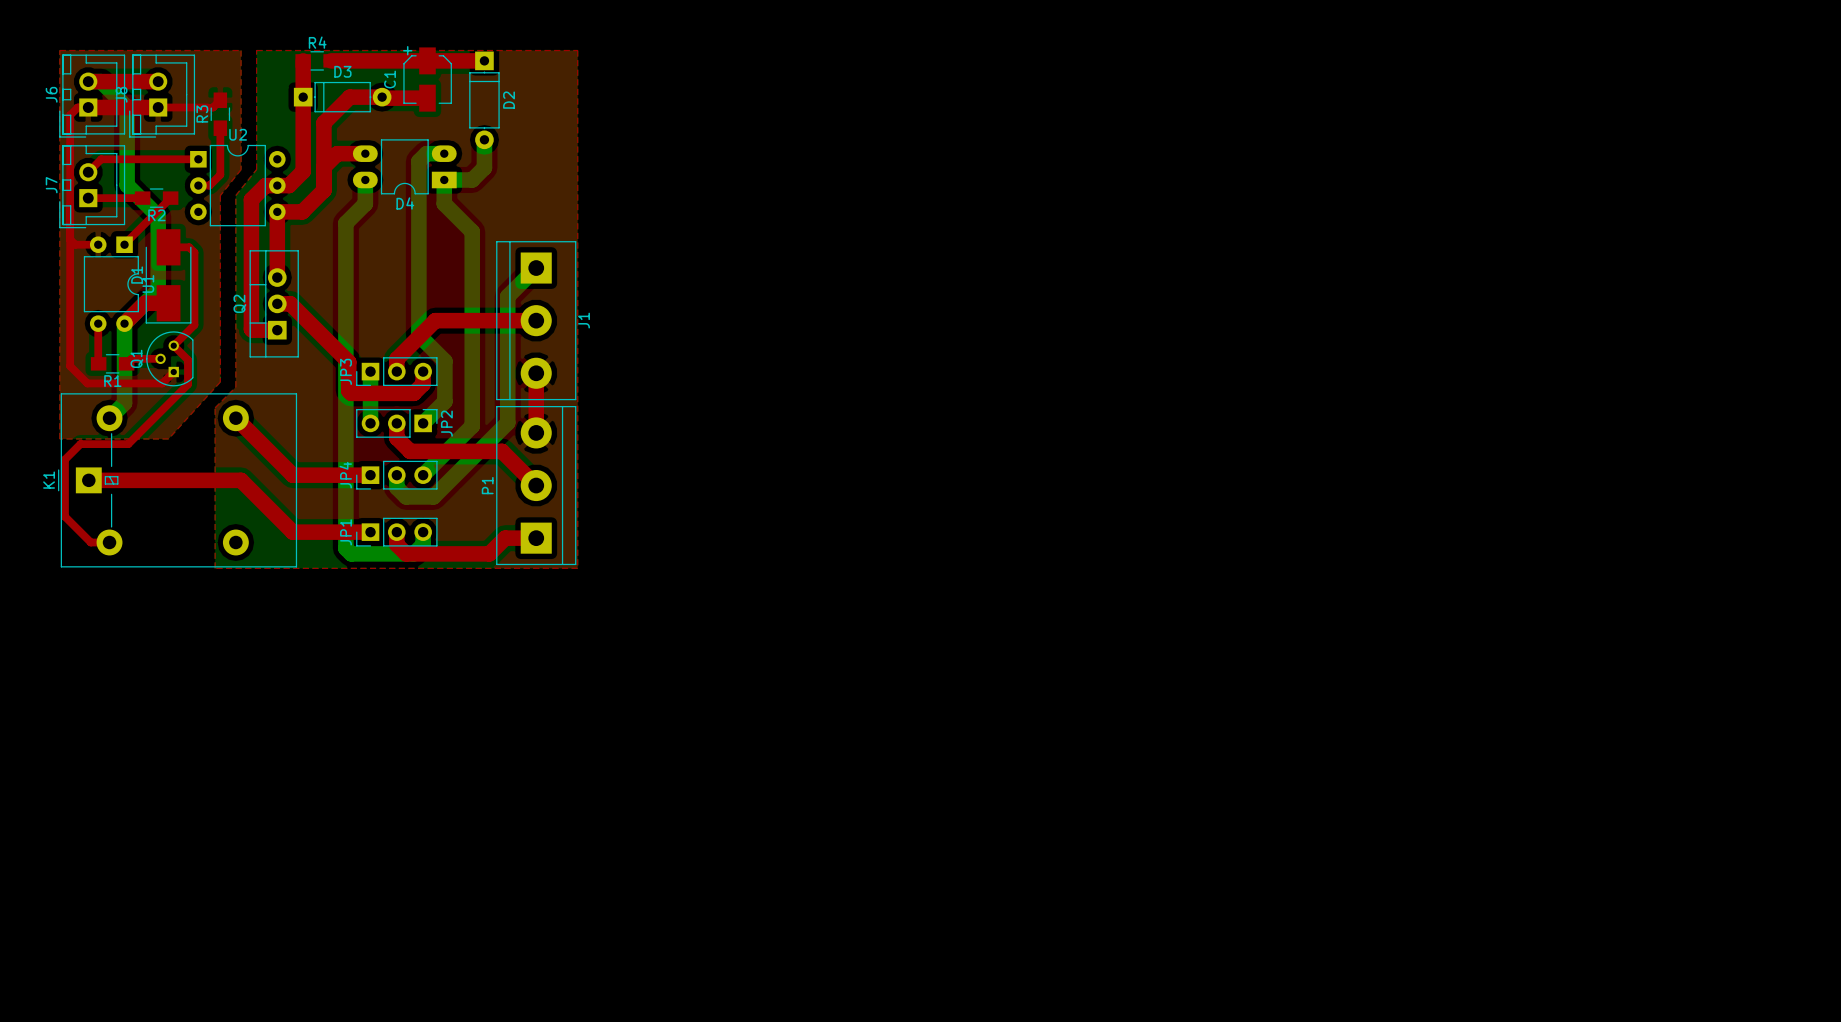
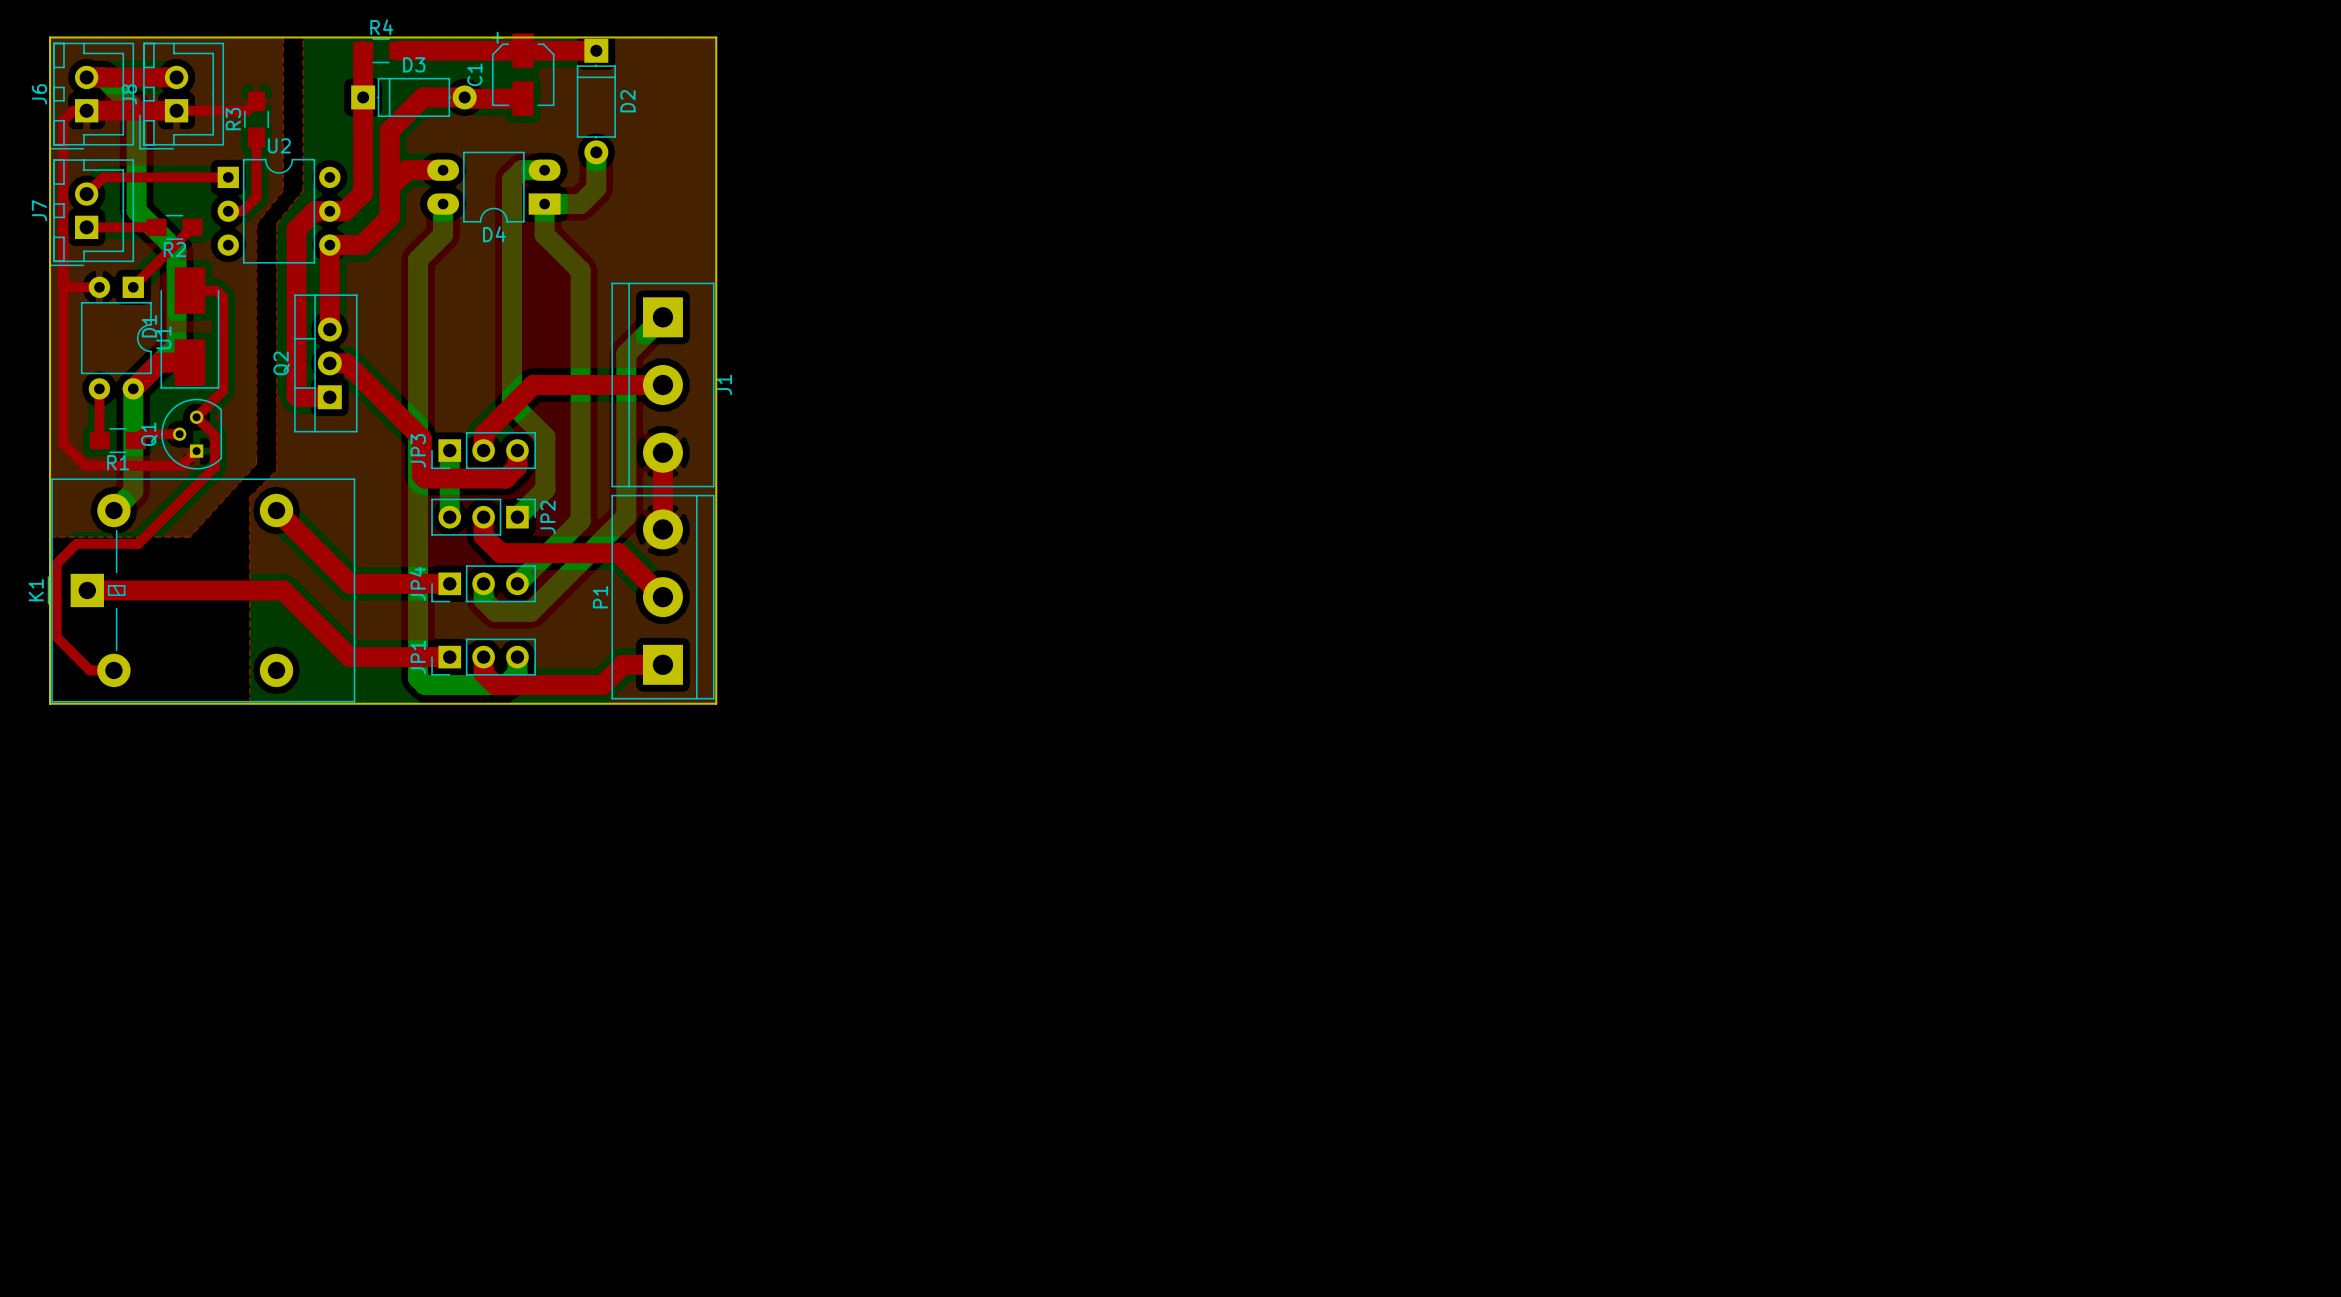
board edge: none -> (50, 37) (50, 703) (716, 703) (716, 37) (50, 37)

